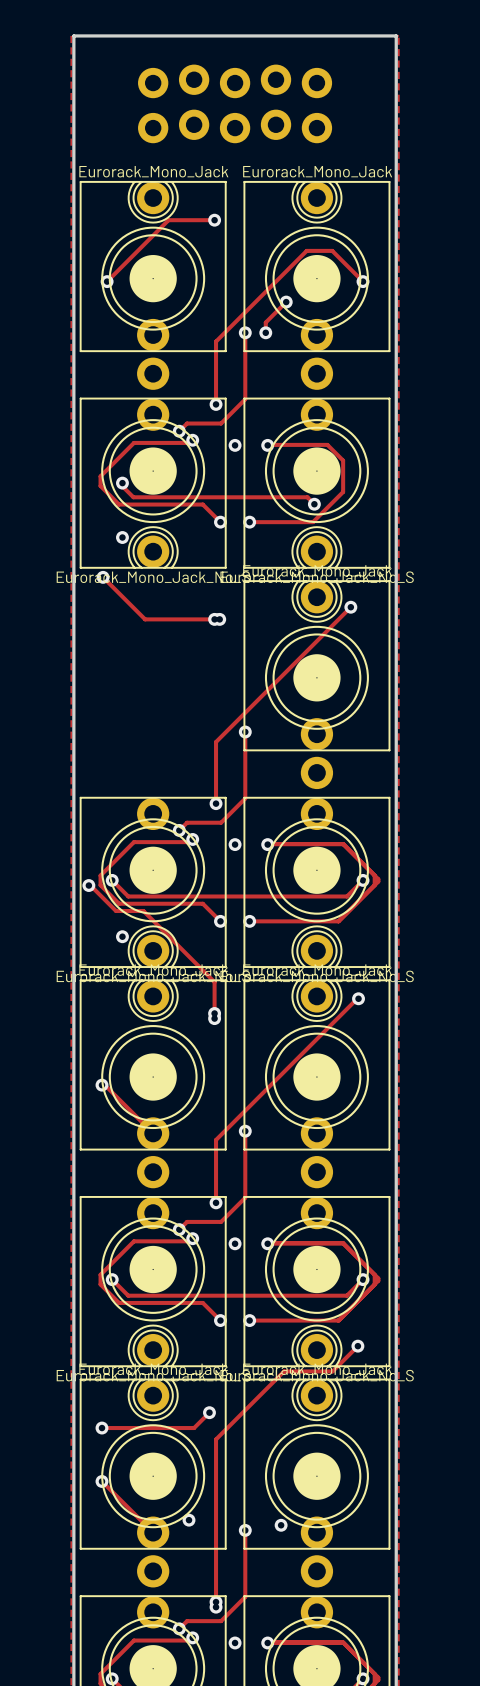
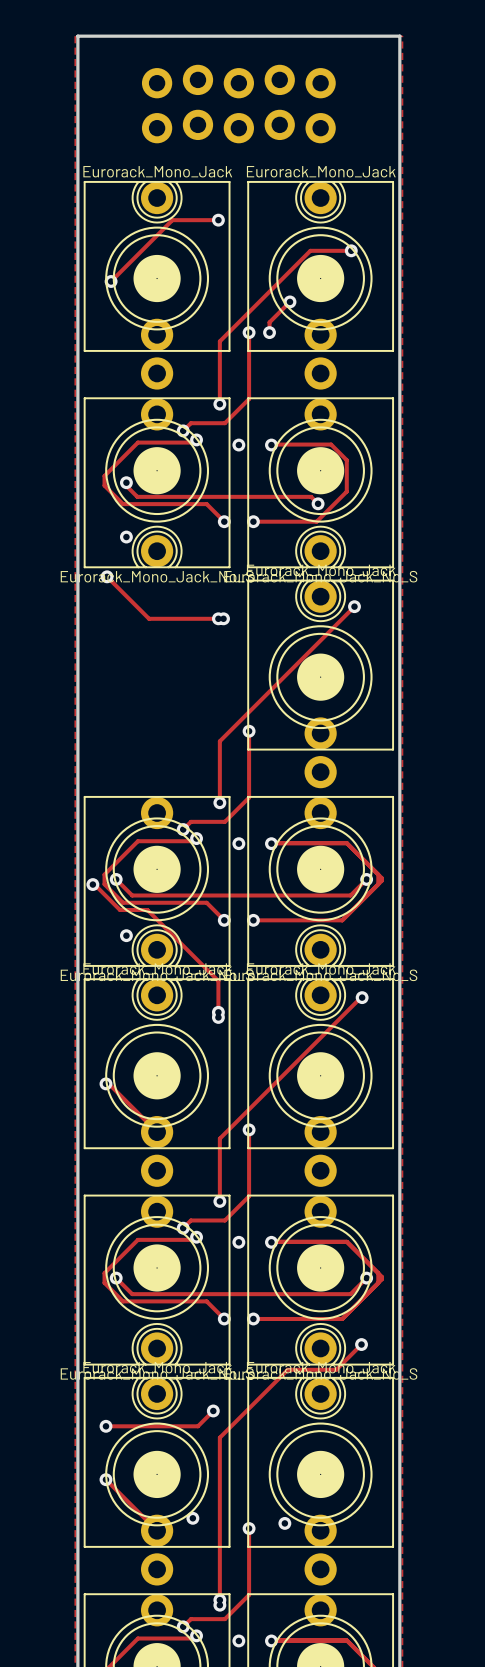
track: (332, 250) (363, 281) -> (335, 250) (351, 250)
via position: (363, 281) -> (351, 250)

